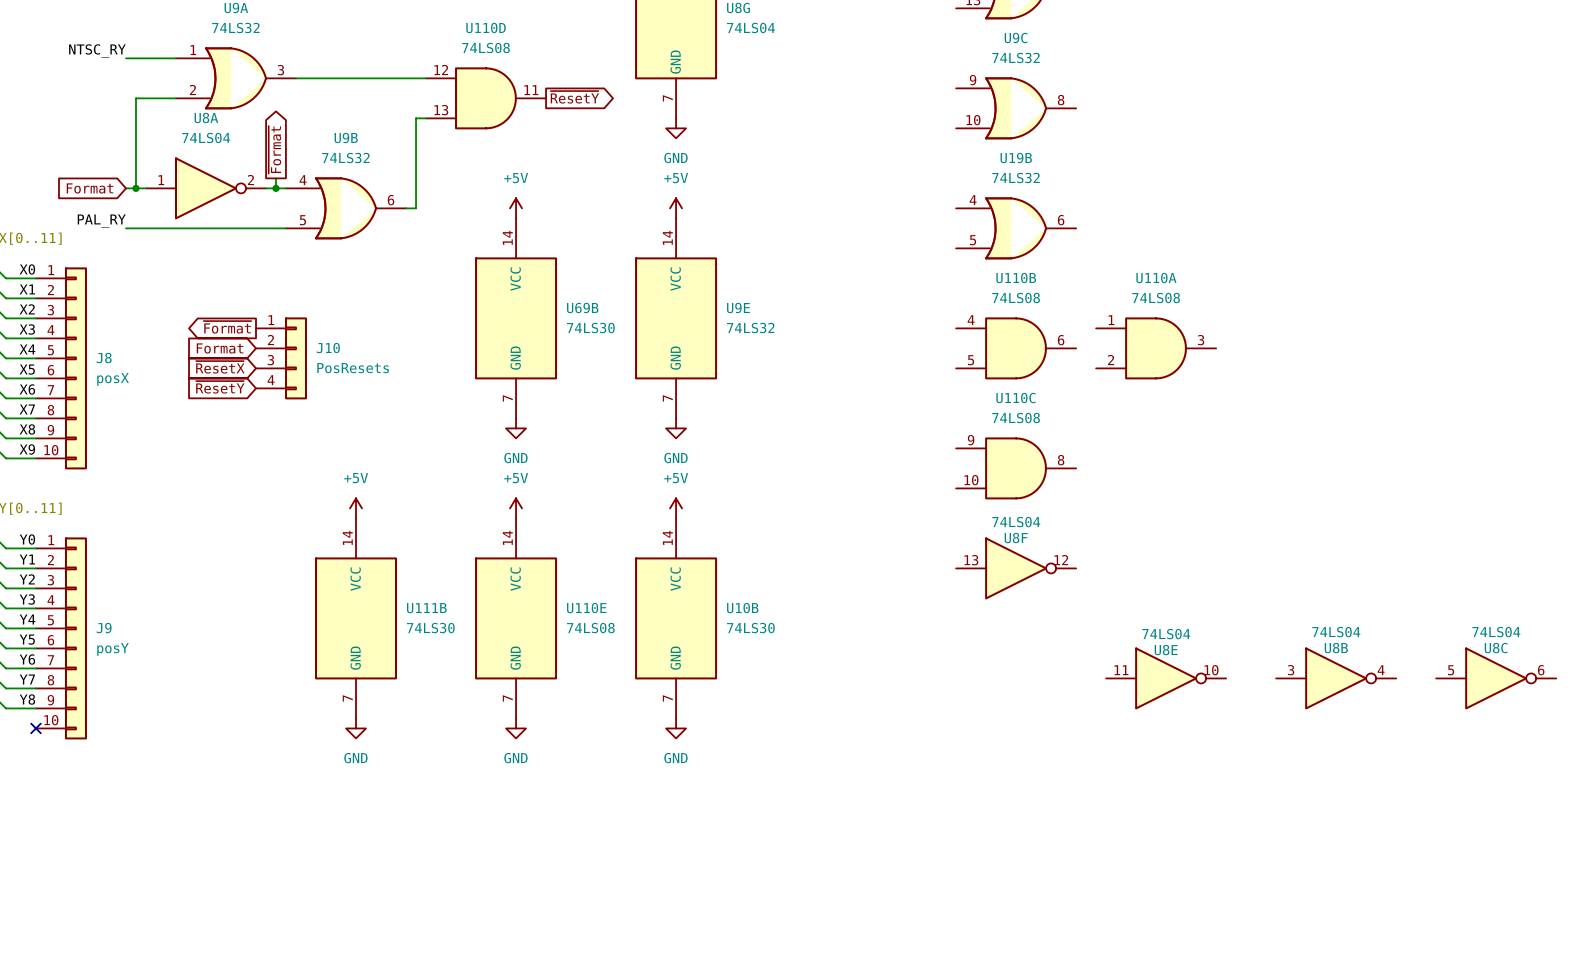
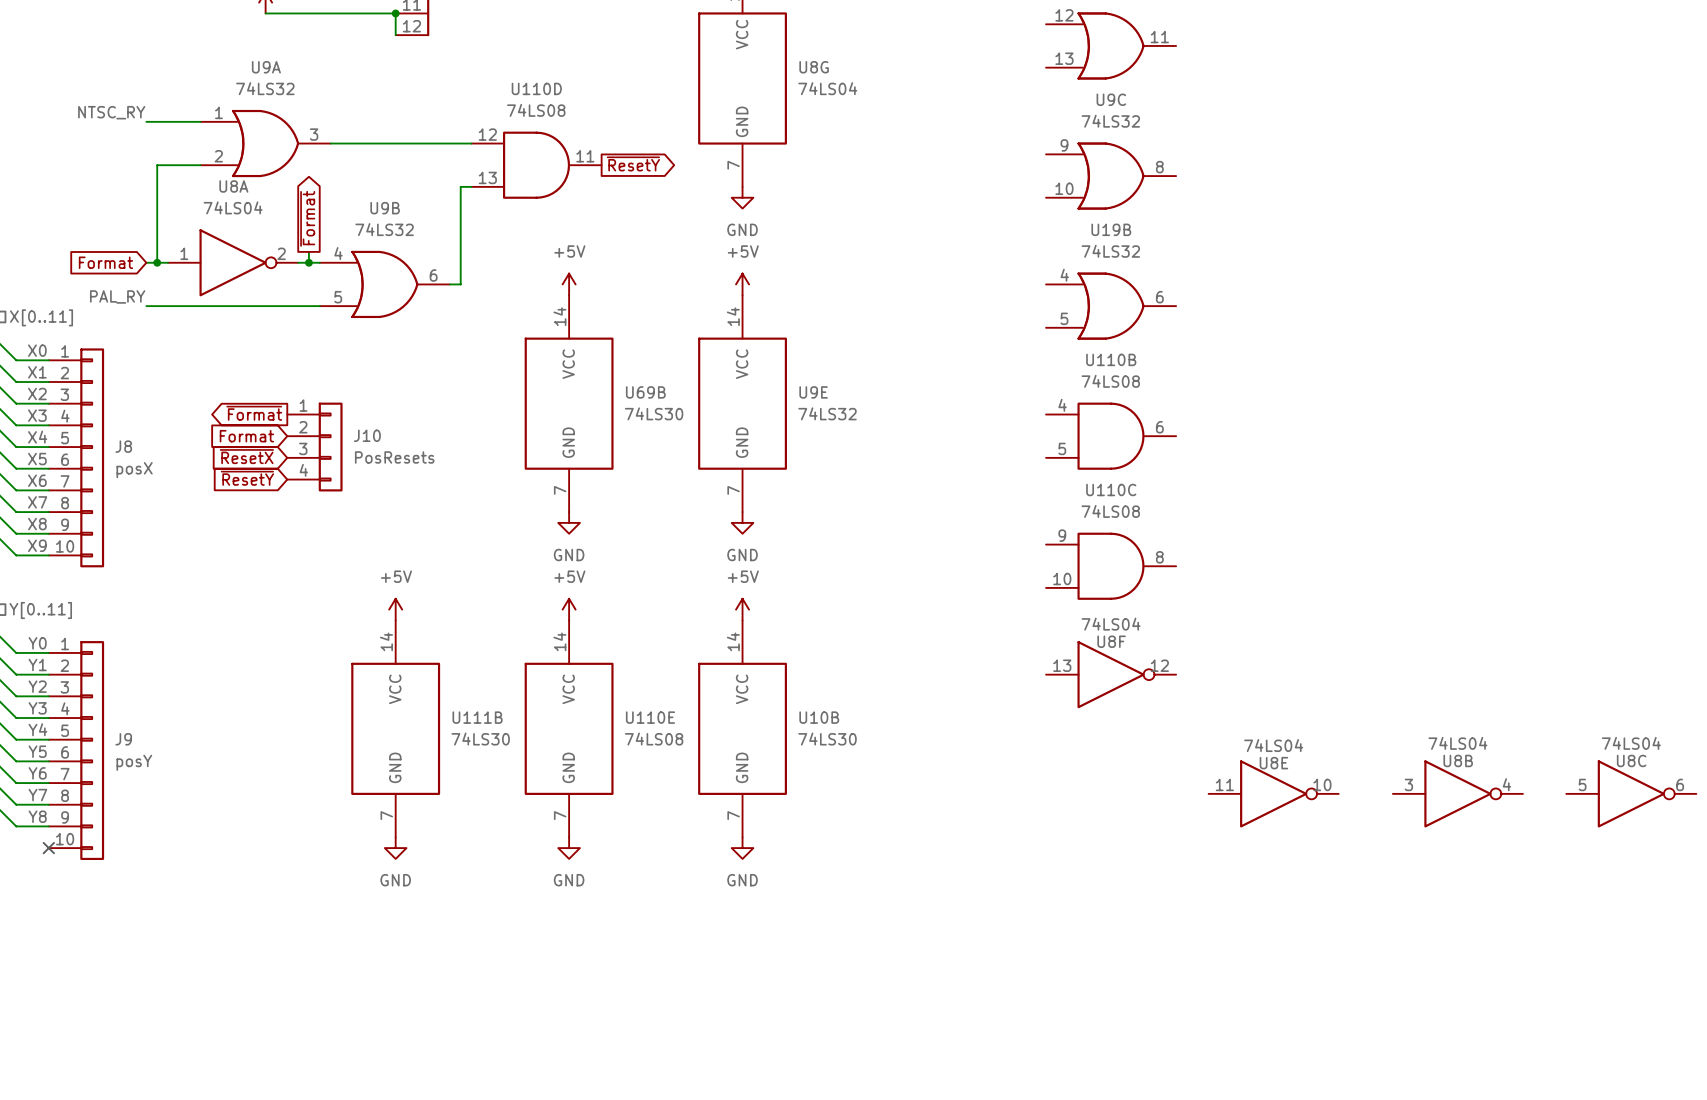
U110A: 74LS08 (1156, 348) -> none

